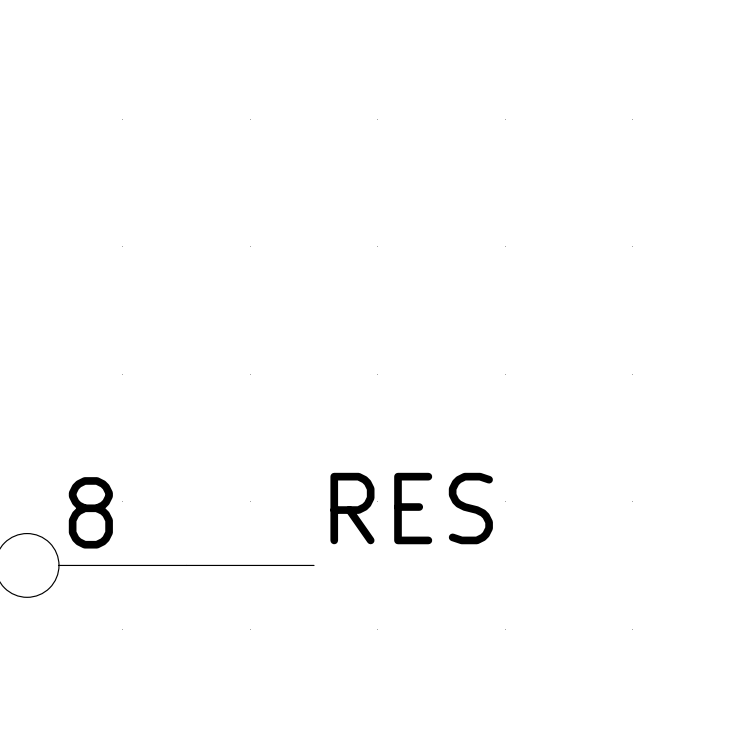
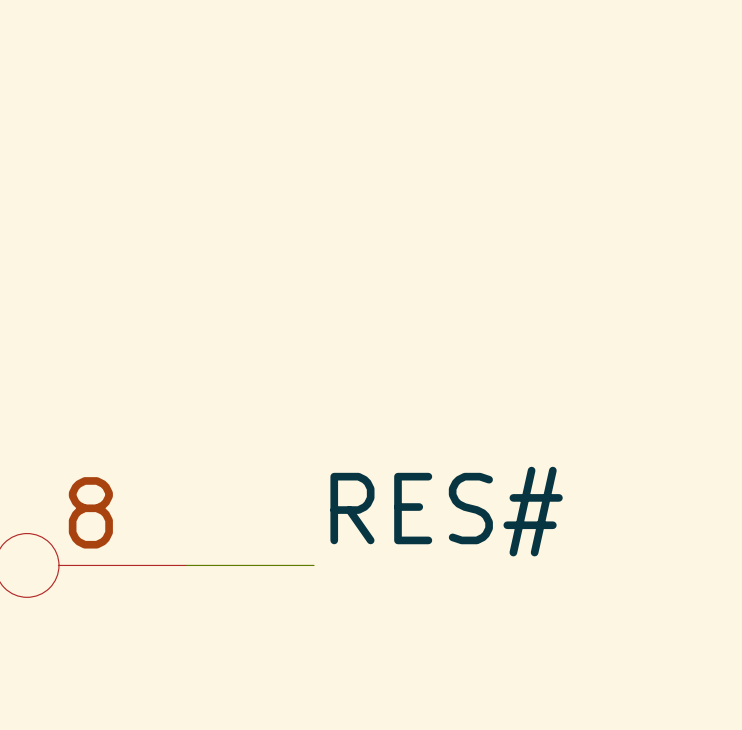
label: RES (411, 508) -> RES# (446, 511)

